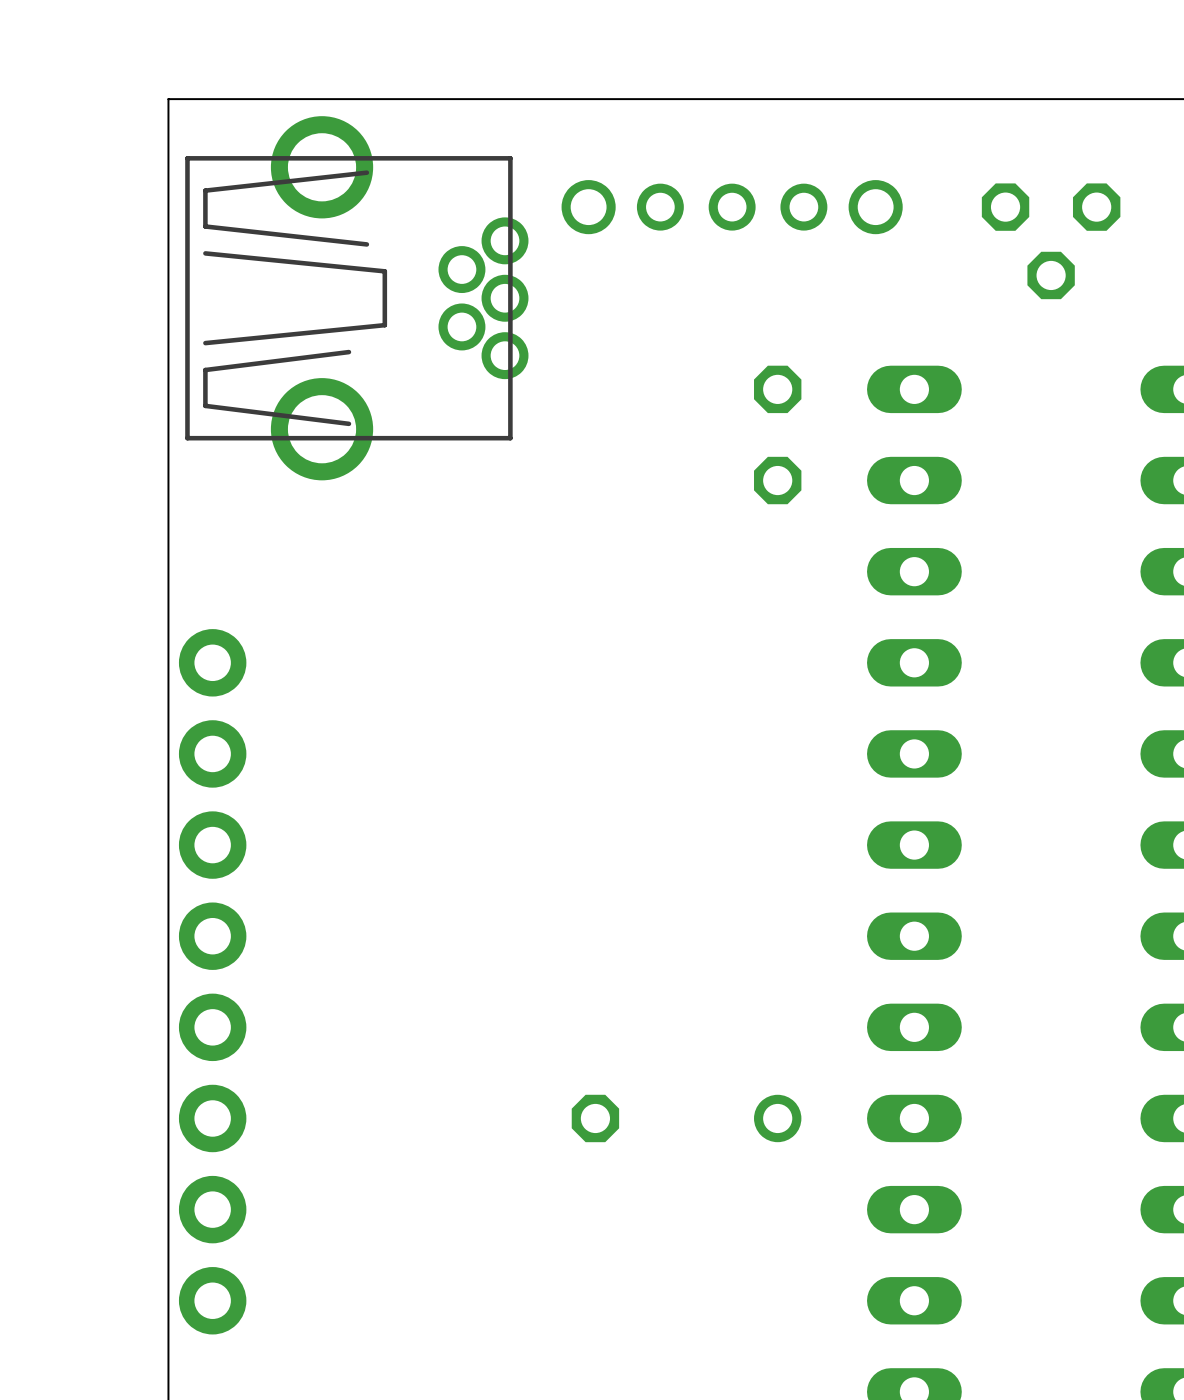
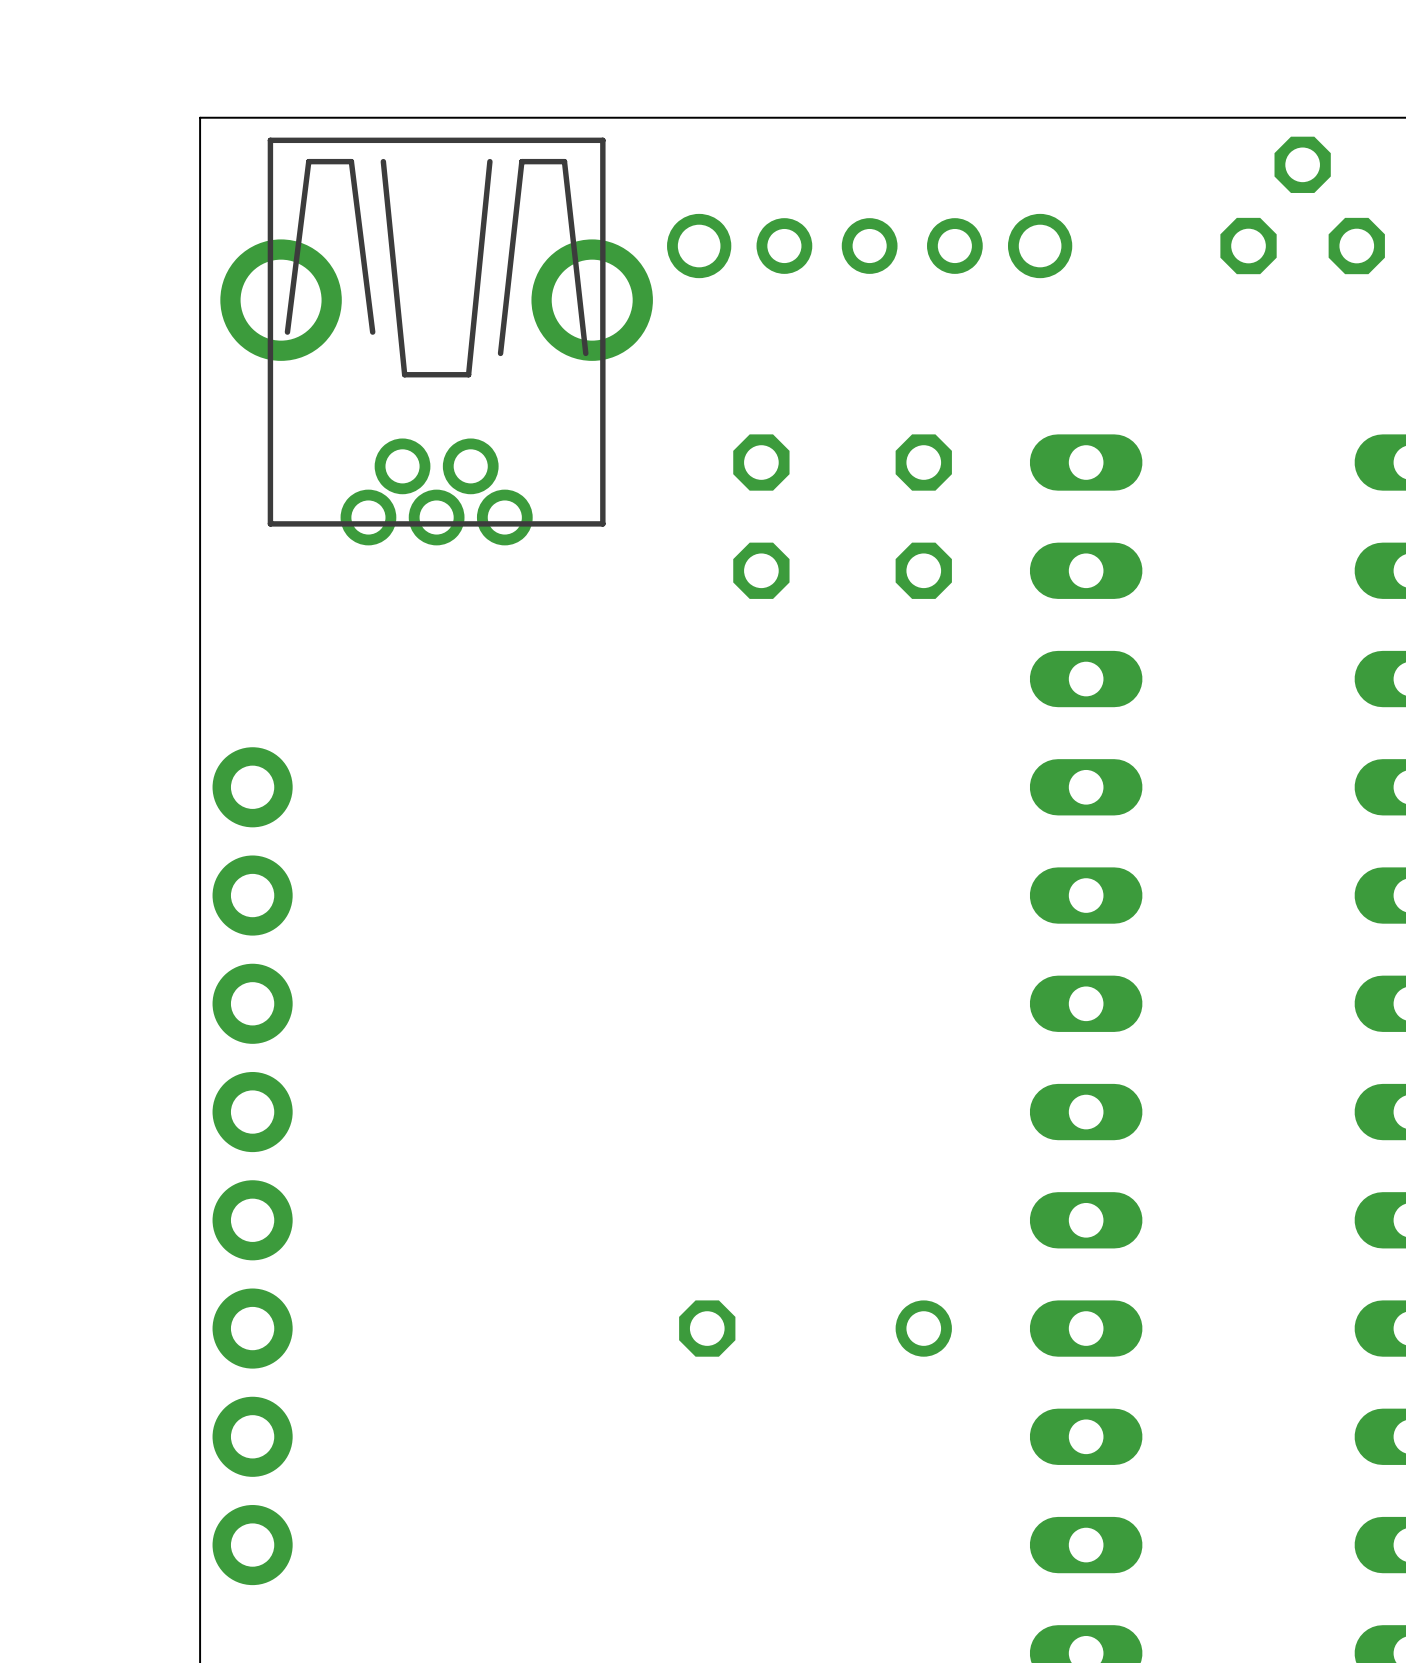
part rotation: 0° (1051, 241) -> 180° (1302, 205)
part rotation: 0° (356, 298) -> 90° clockwise (436, 341)
part: none -> (761, 516)

